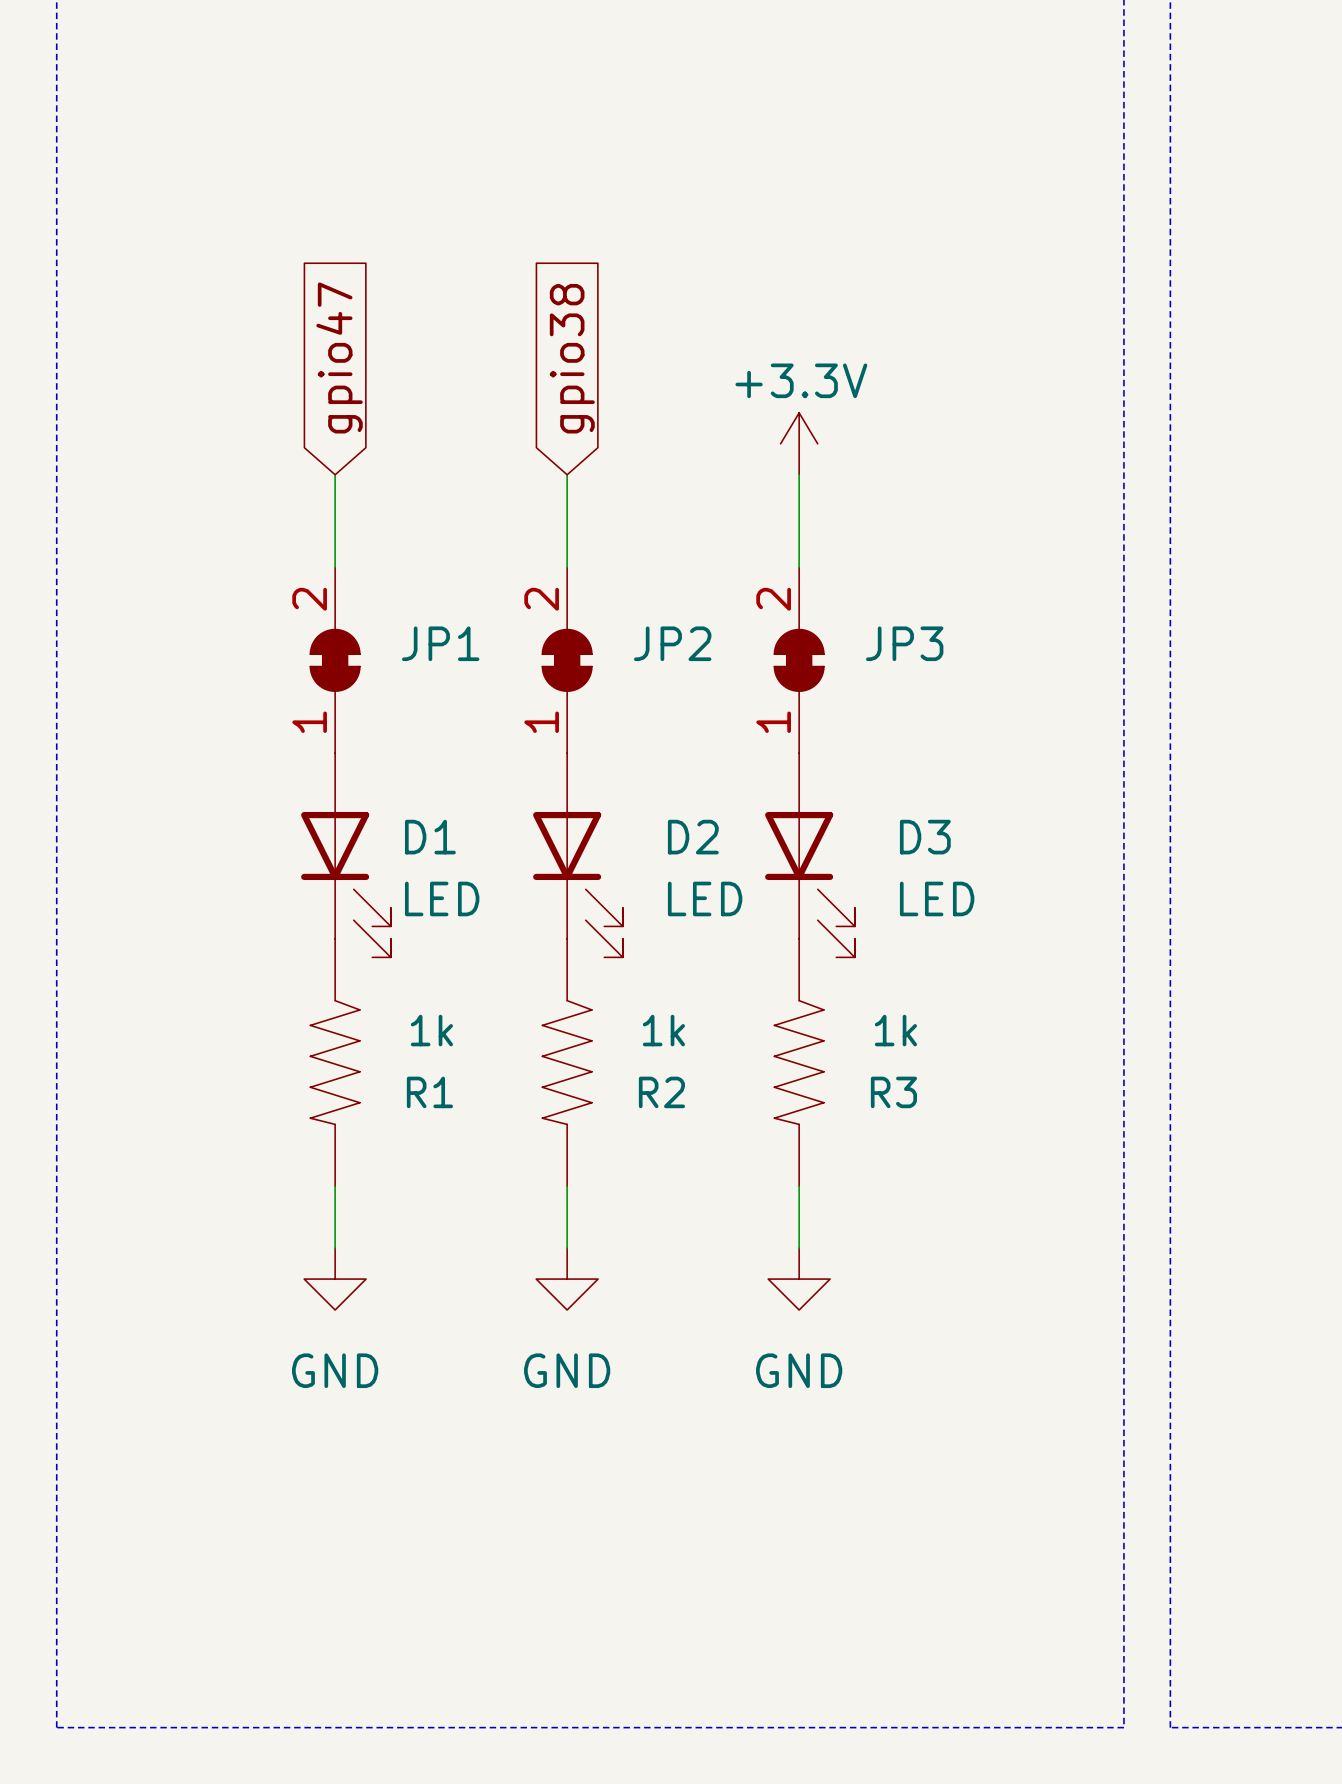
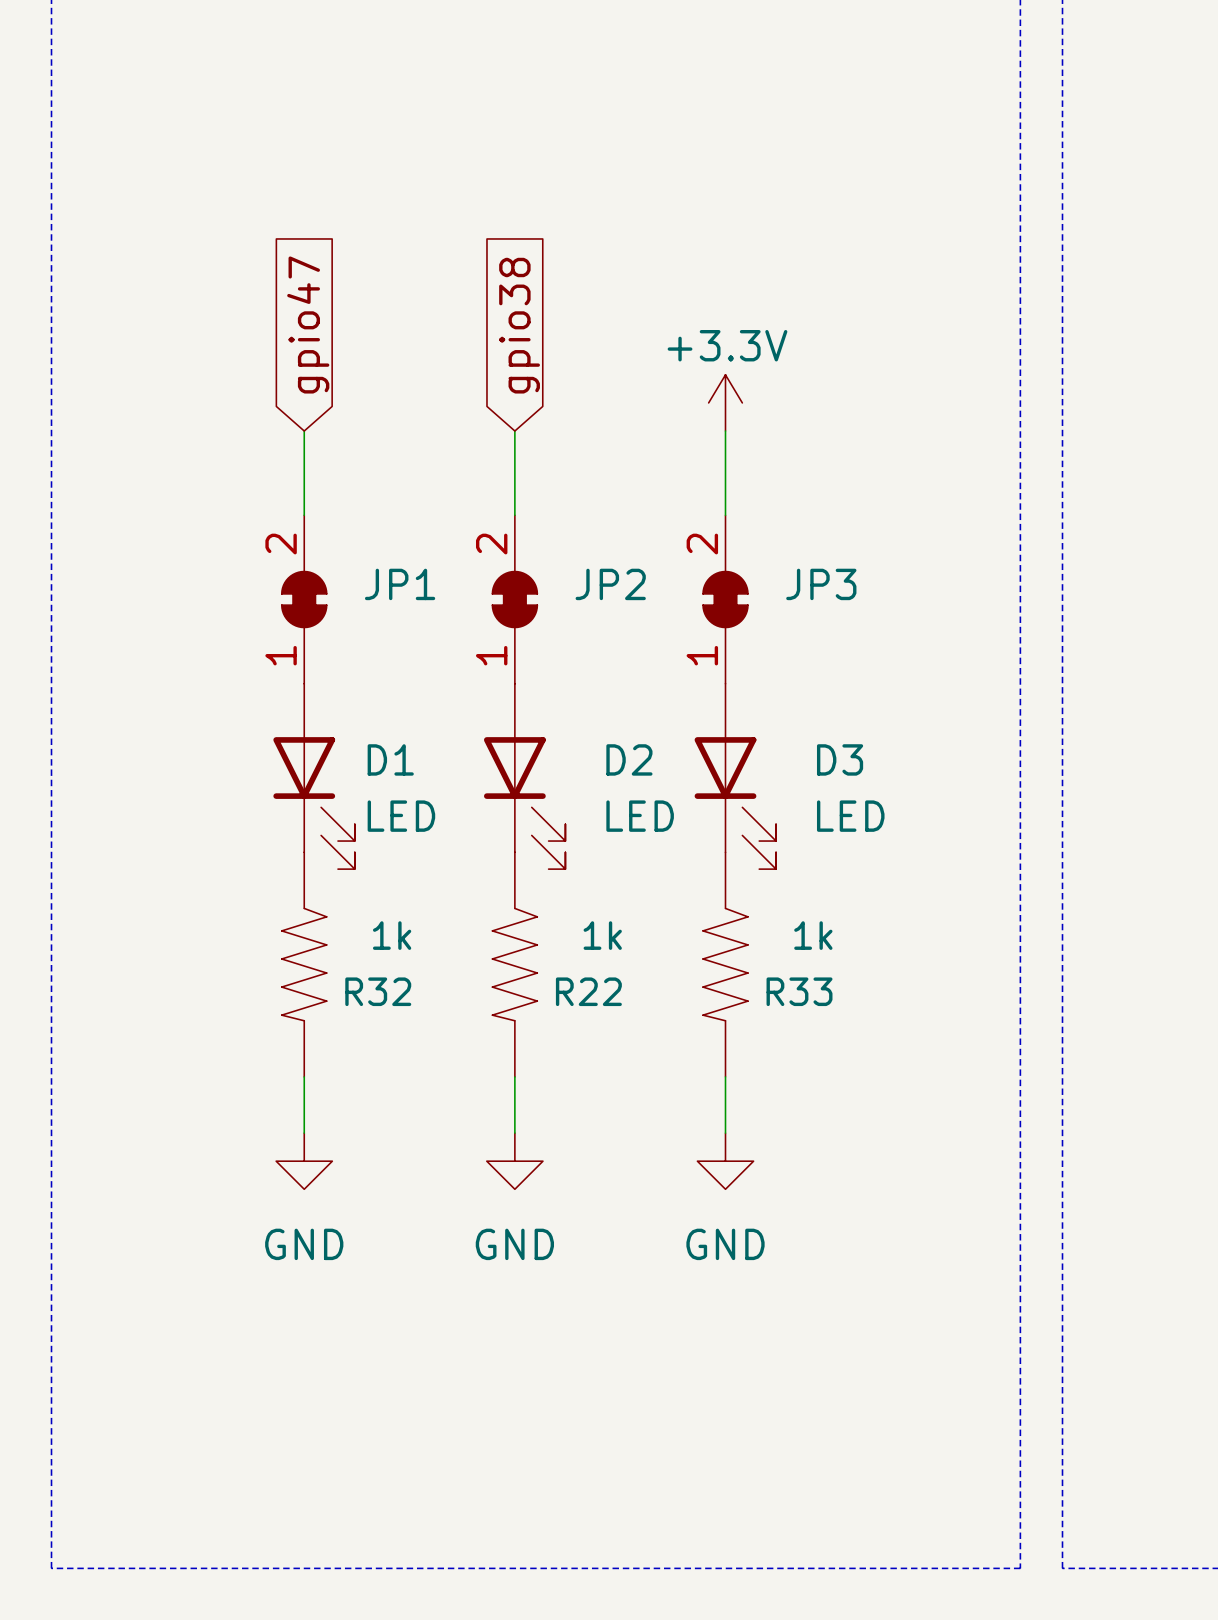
R1 name: R1 (429, 1092) -> R32 (378, 991)
R2 name: R2 (661, 1092) -> R22 (588, 991)
R3 name: R3 (893, 1092) -> R33 (799, 991)

